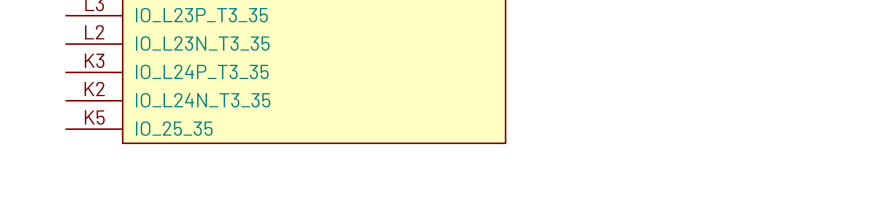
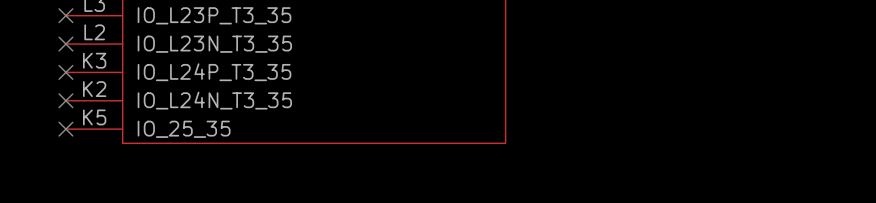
no-connect mark: none -> (65, 15)
no-connect mark: none -> (65, 44)
no-connect mark: none -> (65, 72)
no-connect mark: none -> (65, 100)
no-connect mark: none -> (65, 129)

